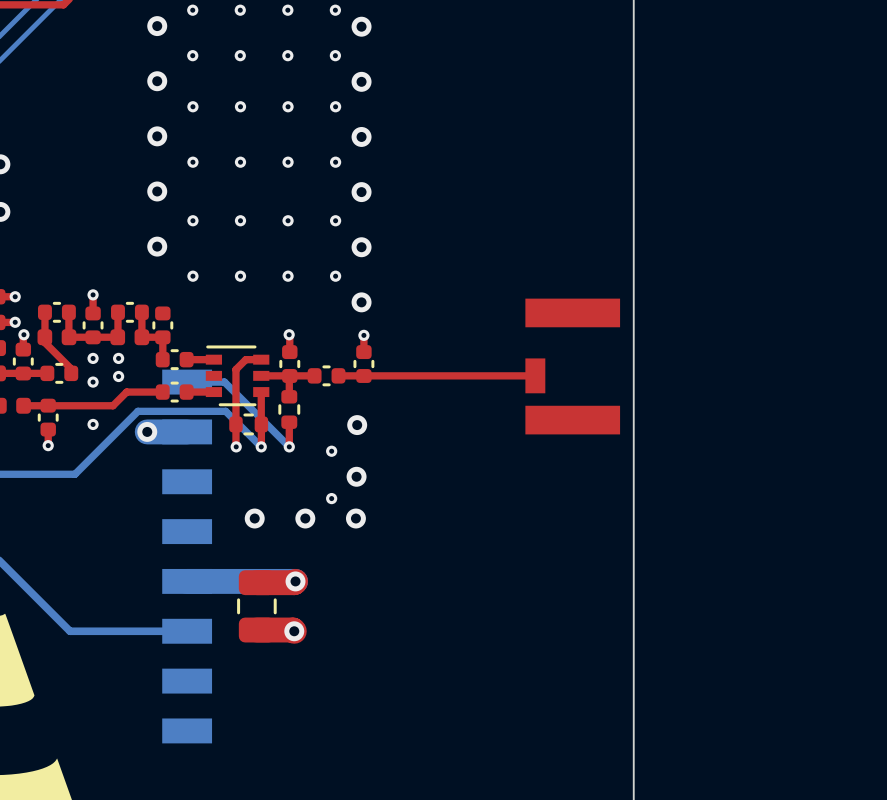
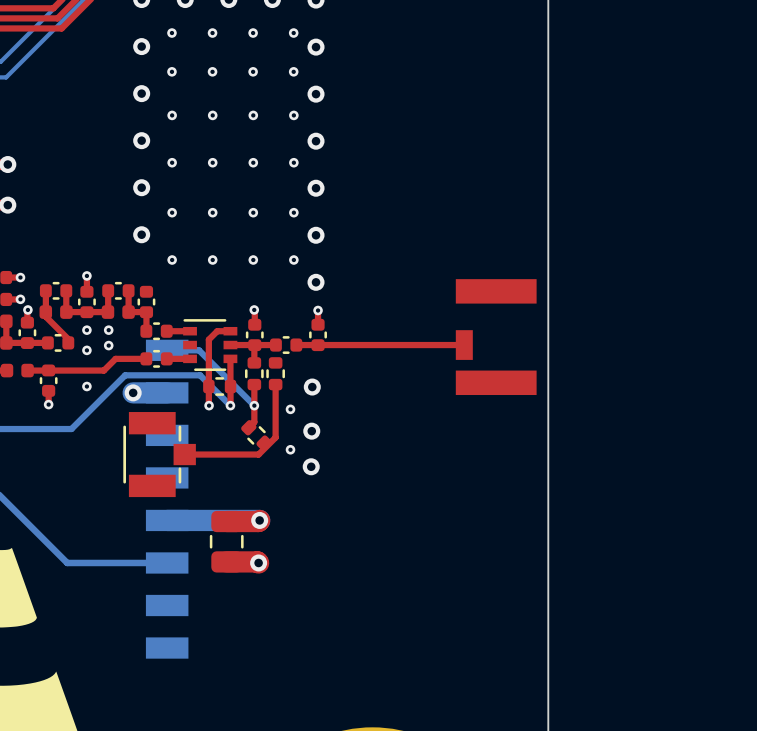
part: none -> (275, 373)
top track: none -> (275, 384) (275, 437) (258, 454) (184, 454)
top track: none -> (254, 405) (254, 422) (248, 427)
part: none -> (256, 435)
part: none -> (159, 454)
via: (254, 518) -> none
via: (305, 518) -> none

